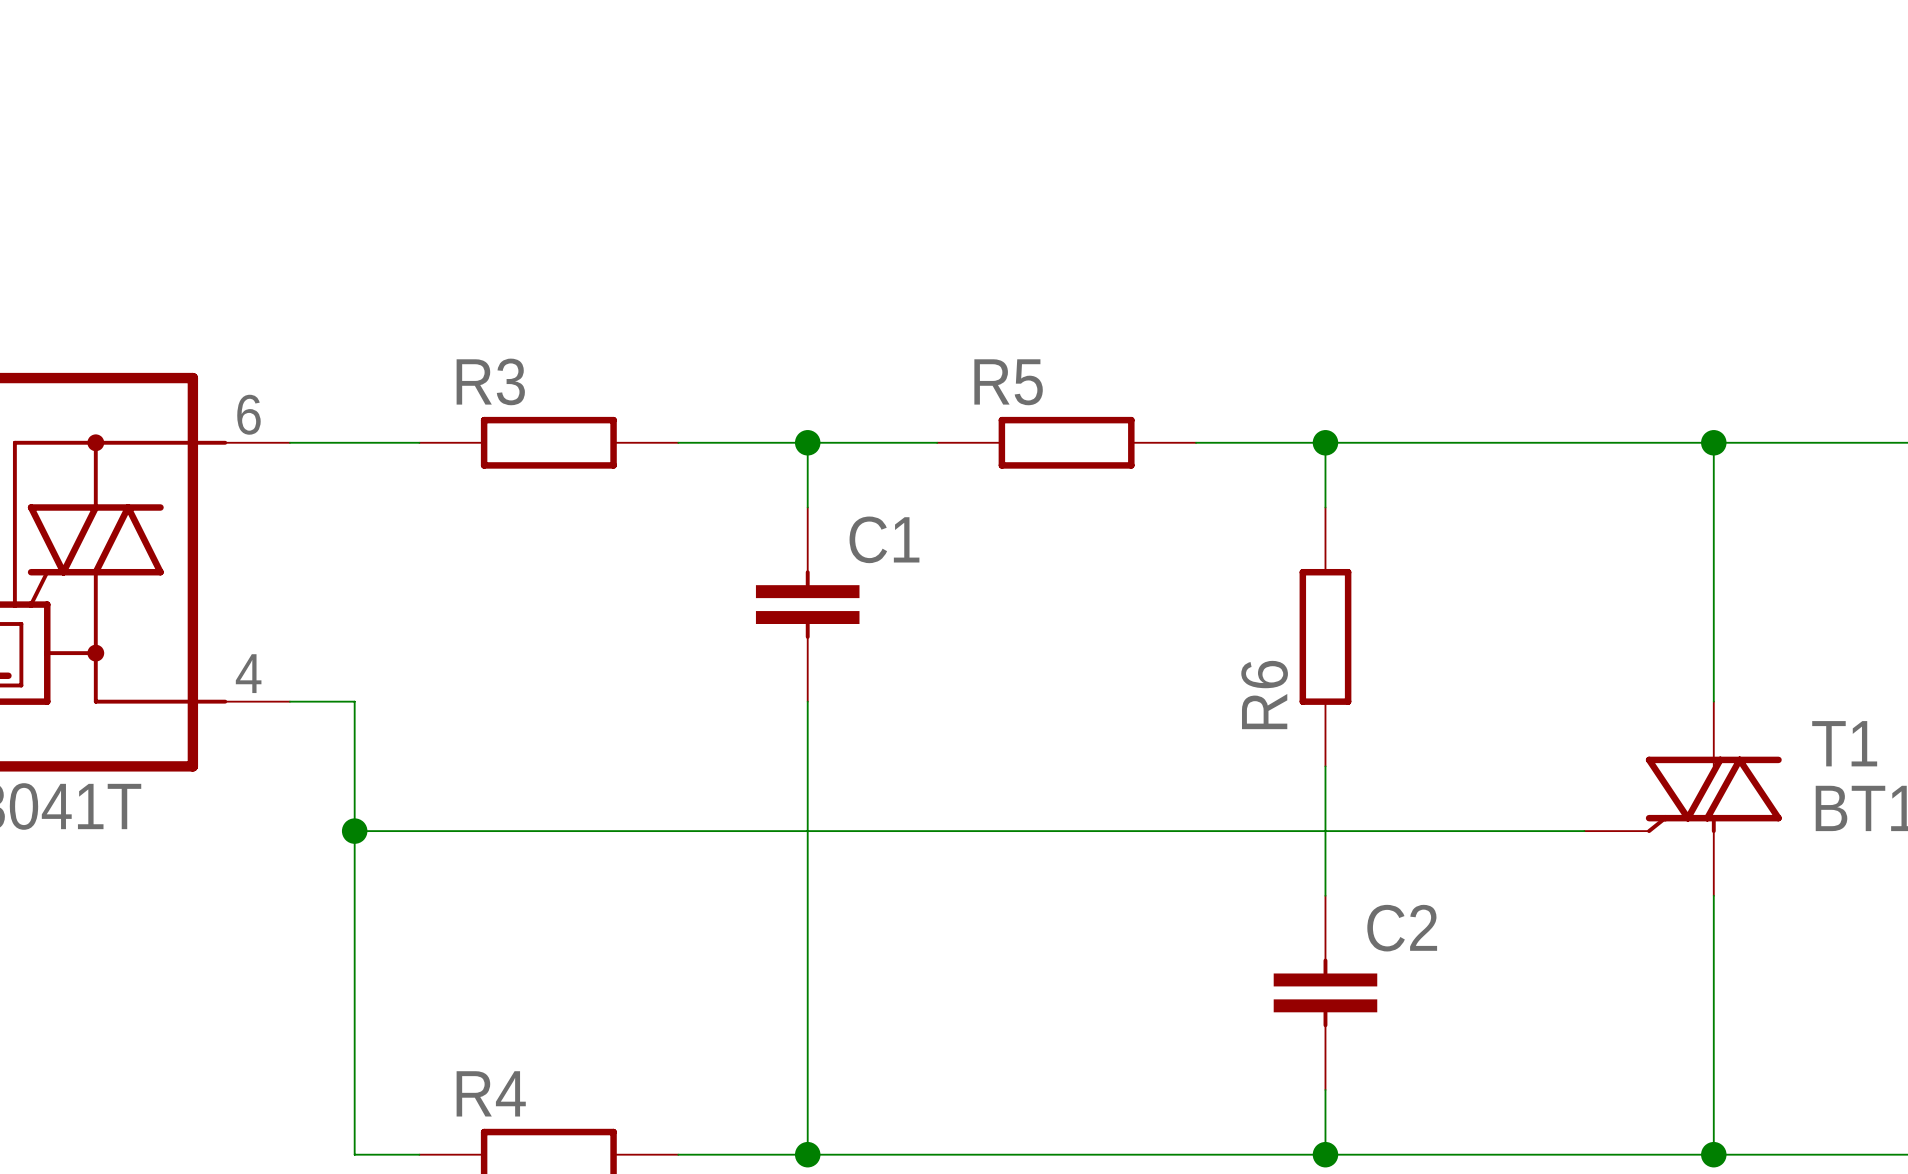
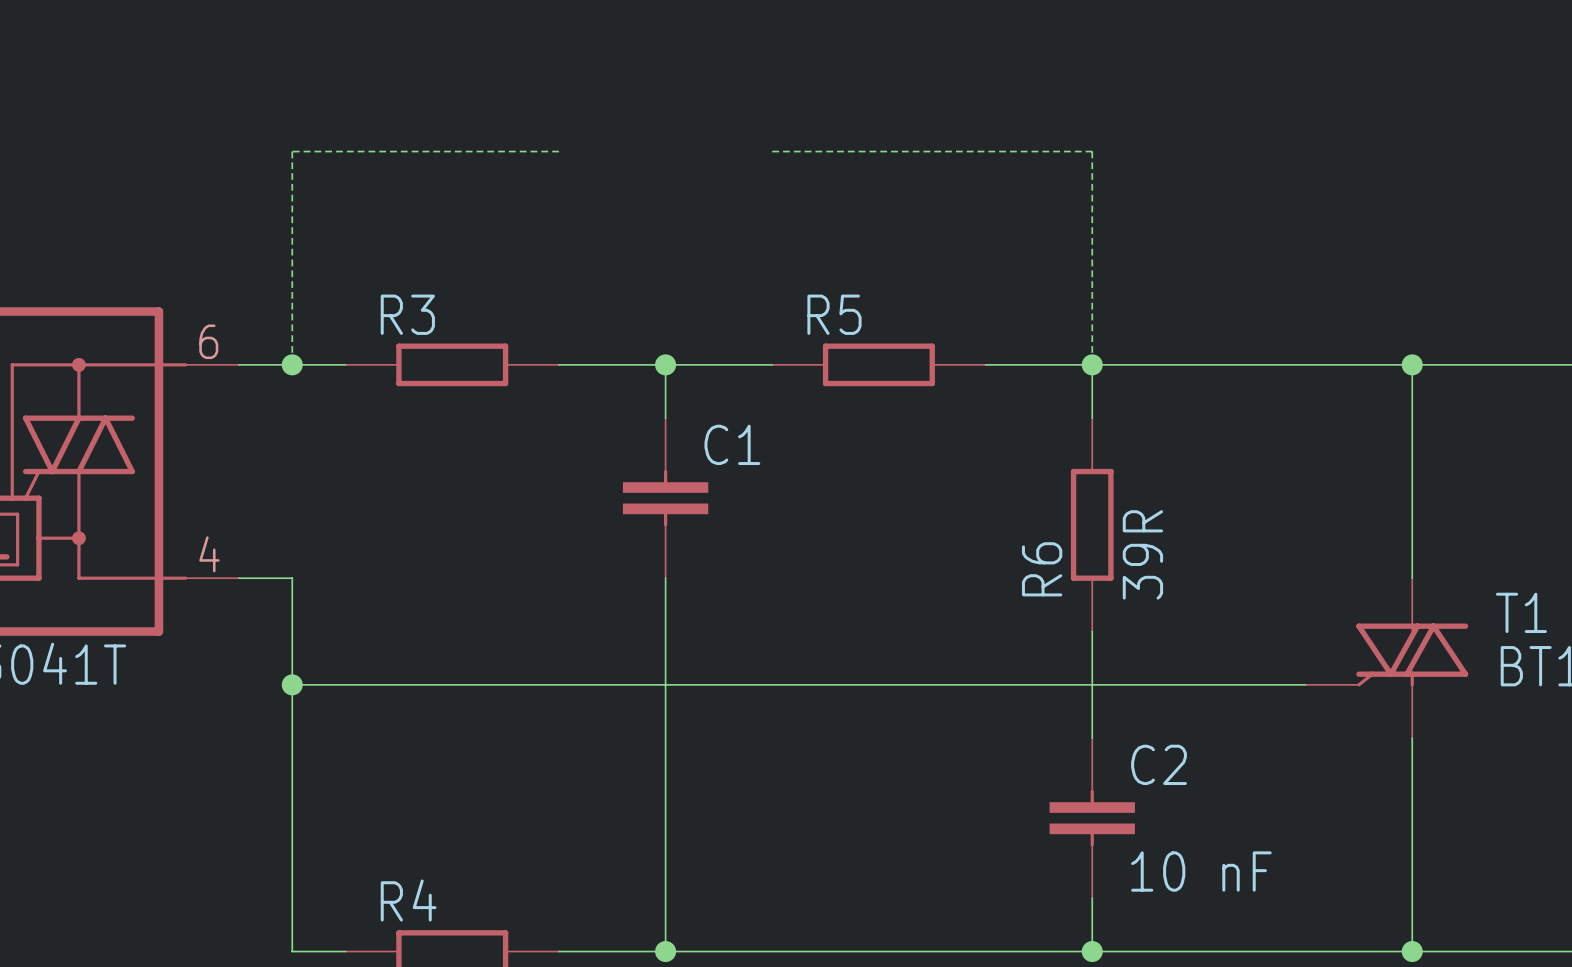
wire: none -> (558, 151) (292, 151) (292, 364)
wire: none -> (772, 151) (1092, 151) (1092, 364)
junction: none -> (292, 364)
R6 value: none -> 39R (1142, 554)
C2 value: none -> 10 nF (1201, 871)

